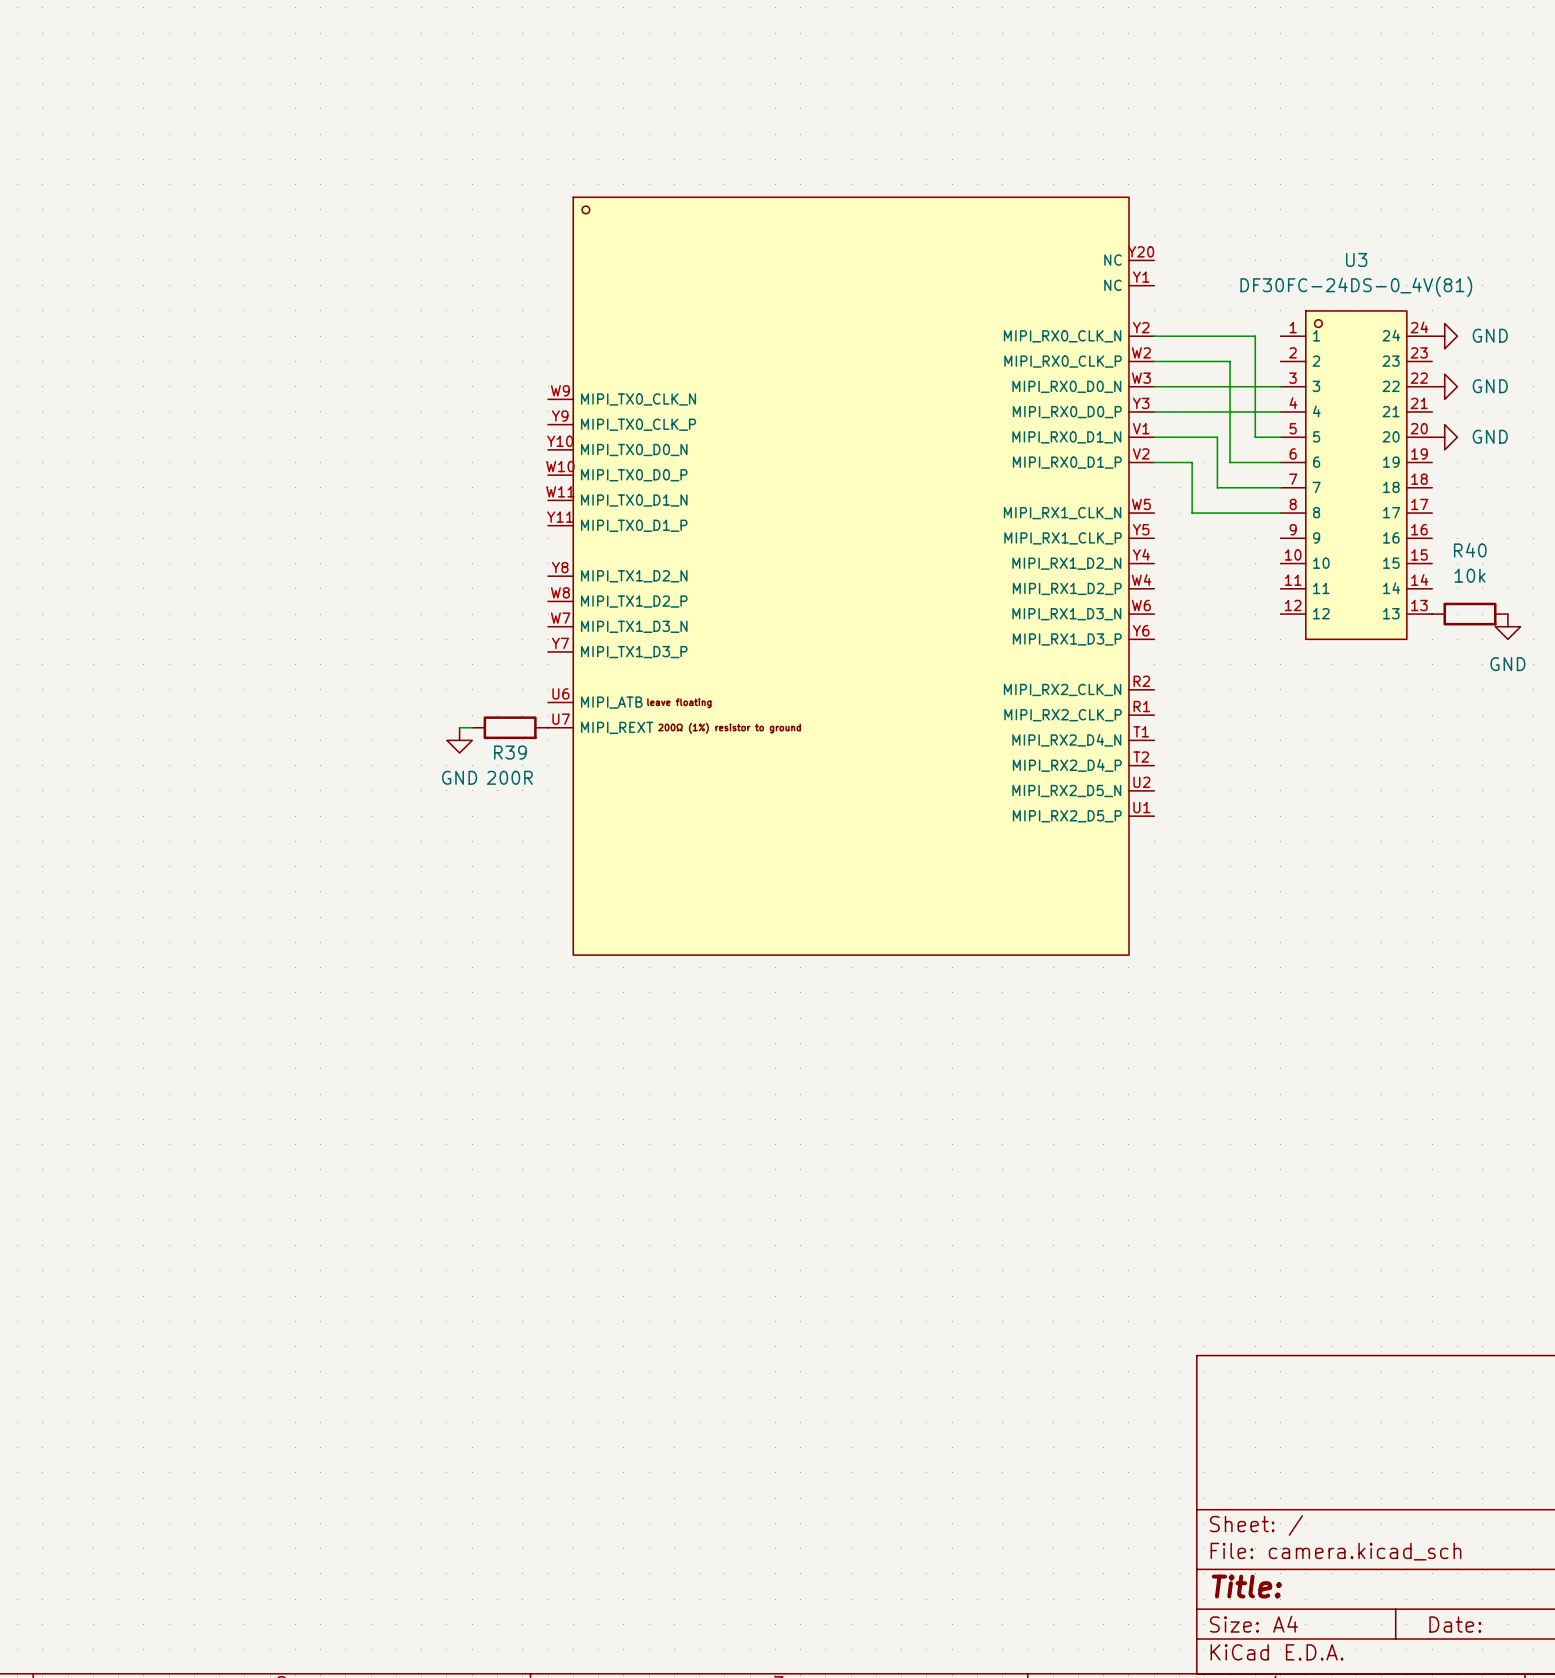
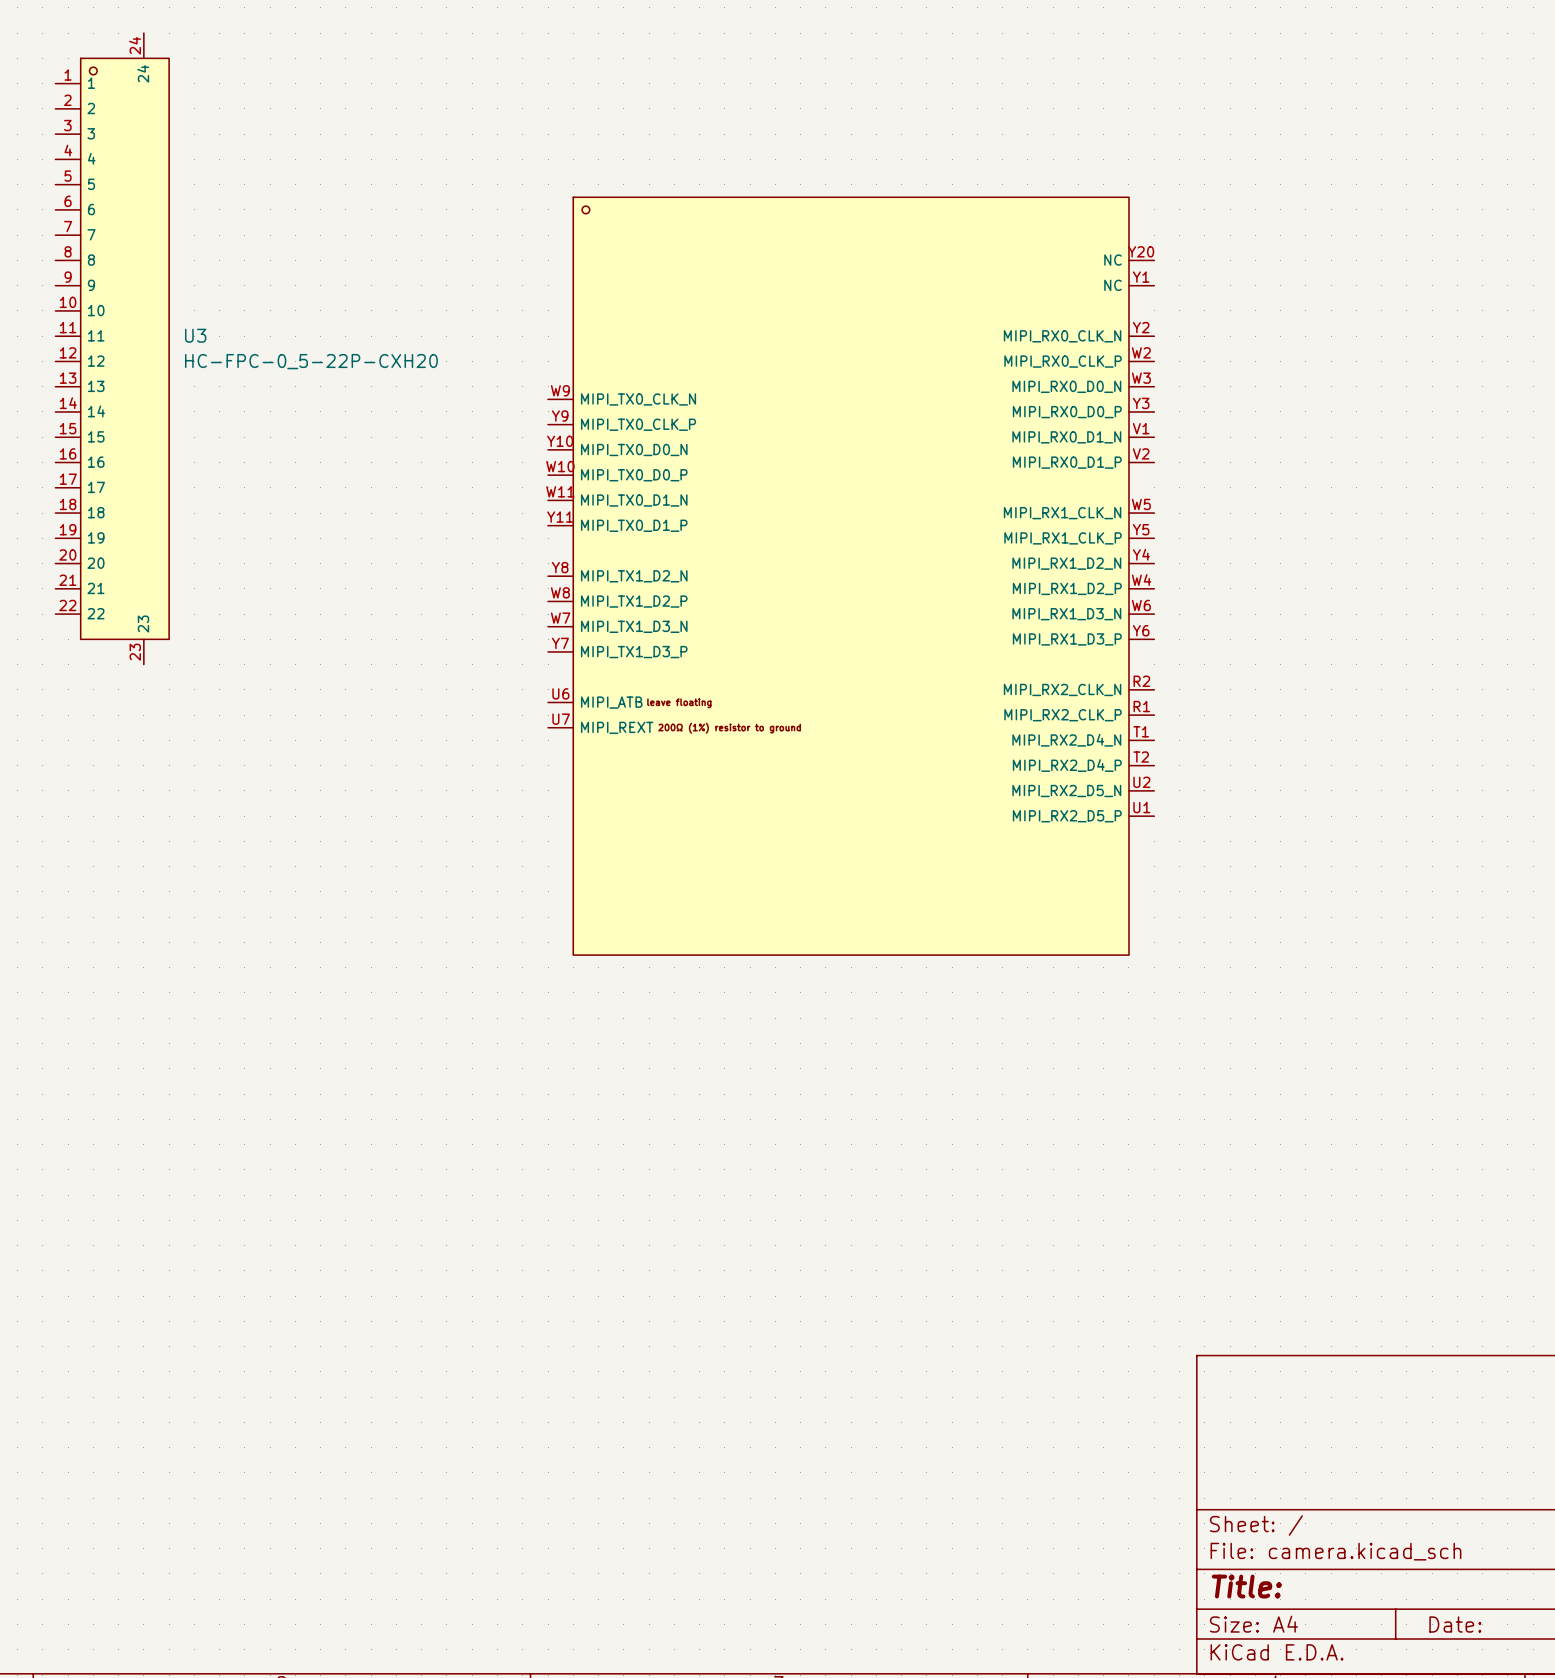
U3 name position: U3 (1356, 259) -> U3 (195, 335)
U3 value: DF30FC-24DS-0_4V(81) (1356, 286) -> HC-FPC-0_5-22P-CXH20 (311, 361)
U3 symbol: [1280, 310, 1433, 640] -> [55, 33, 170, 665]
wire: (1154, 336) (1255, 336) (1255, 437) (1280, 437) -> none
power symbol: GND (1444, 336) -> none
wire: (1154, 361) (1230, 361) (1230, 462) (1280, 462) -> none
wire: (1154, 386) (1280, 386) -> none
power symbol: GND (1444, 386) -> none
wire: (1154, 411) (1280, 411) -> none
wire: (1154, 437) (1217, 437) (1217, 487) (1280, 487) -> none
power symbol: GND (1444, 437) -> none
wire: (1154, 462) (1192, 462) (1192, 513) (1280, 513) -> none
R40: 10k (1470, 614) -> none
power symbol: GND (1507, 626) -> none
wire: (459, 727) (472, 727) -> none
R39: 200R (510, 727) -> none
power symbol: GND (459, 740) -> none

